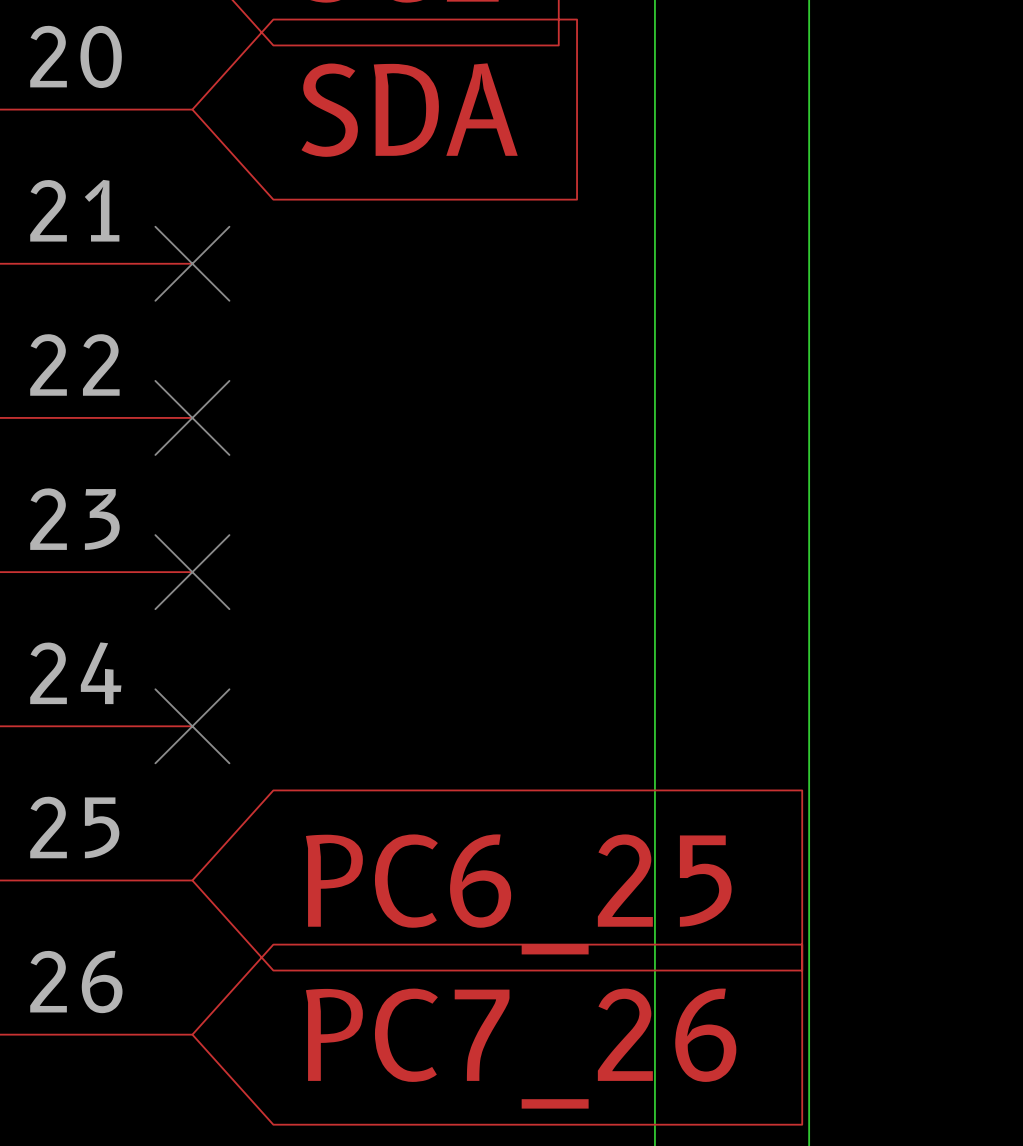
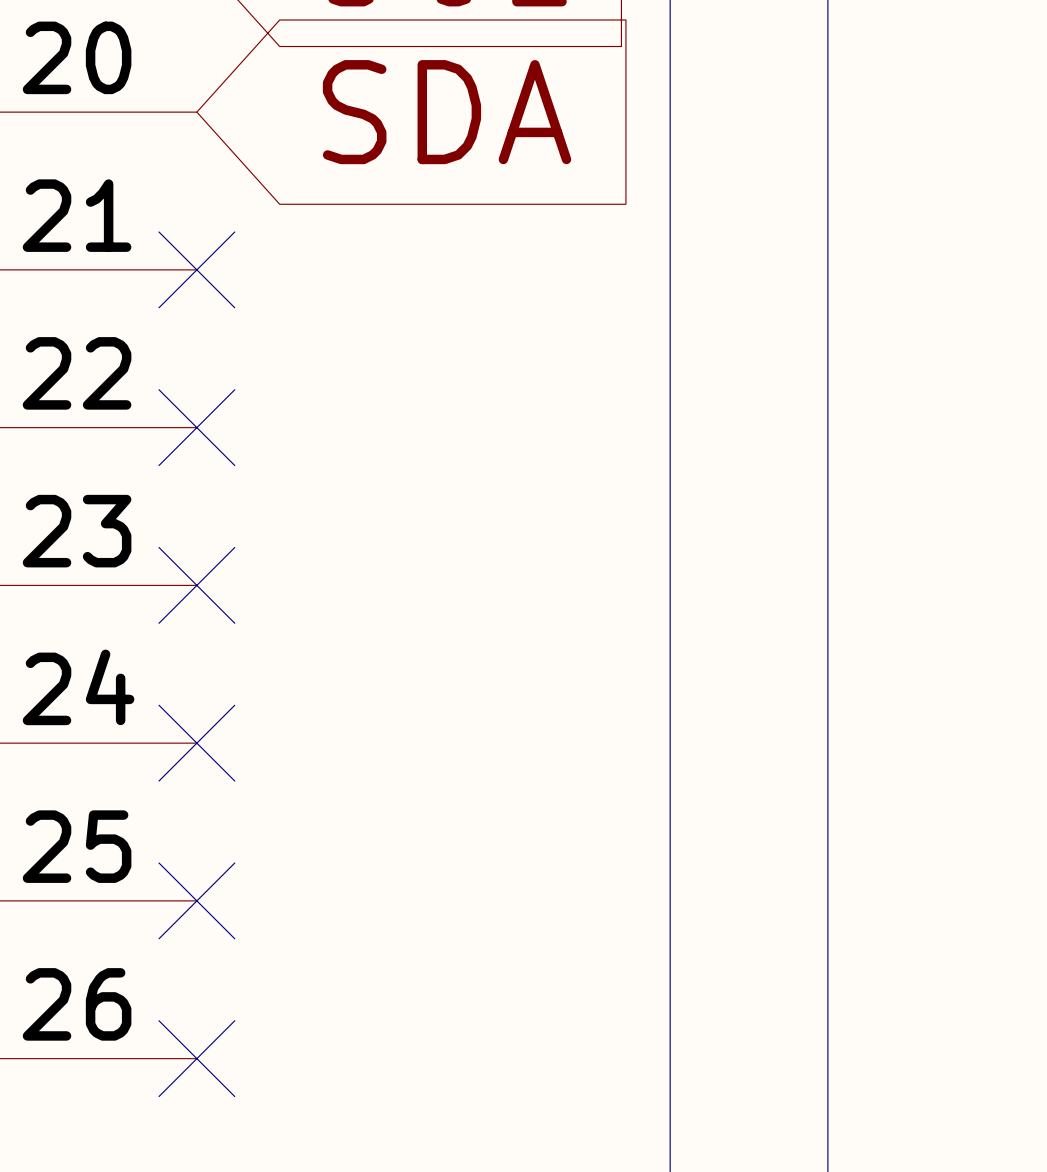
no-connect mark: none -> (196, 900)
global label: PC6_25 (518, 894) -> none
no-connect mark: none -> (196, 1058)
global label: PC7_26 (521, 1048) -> none

